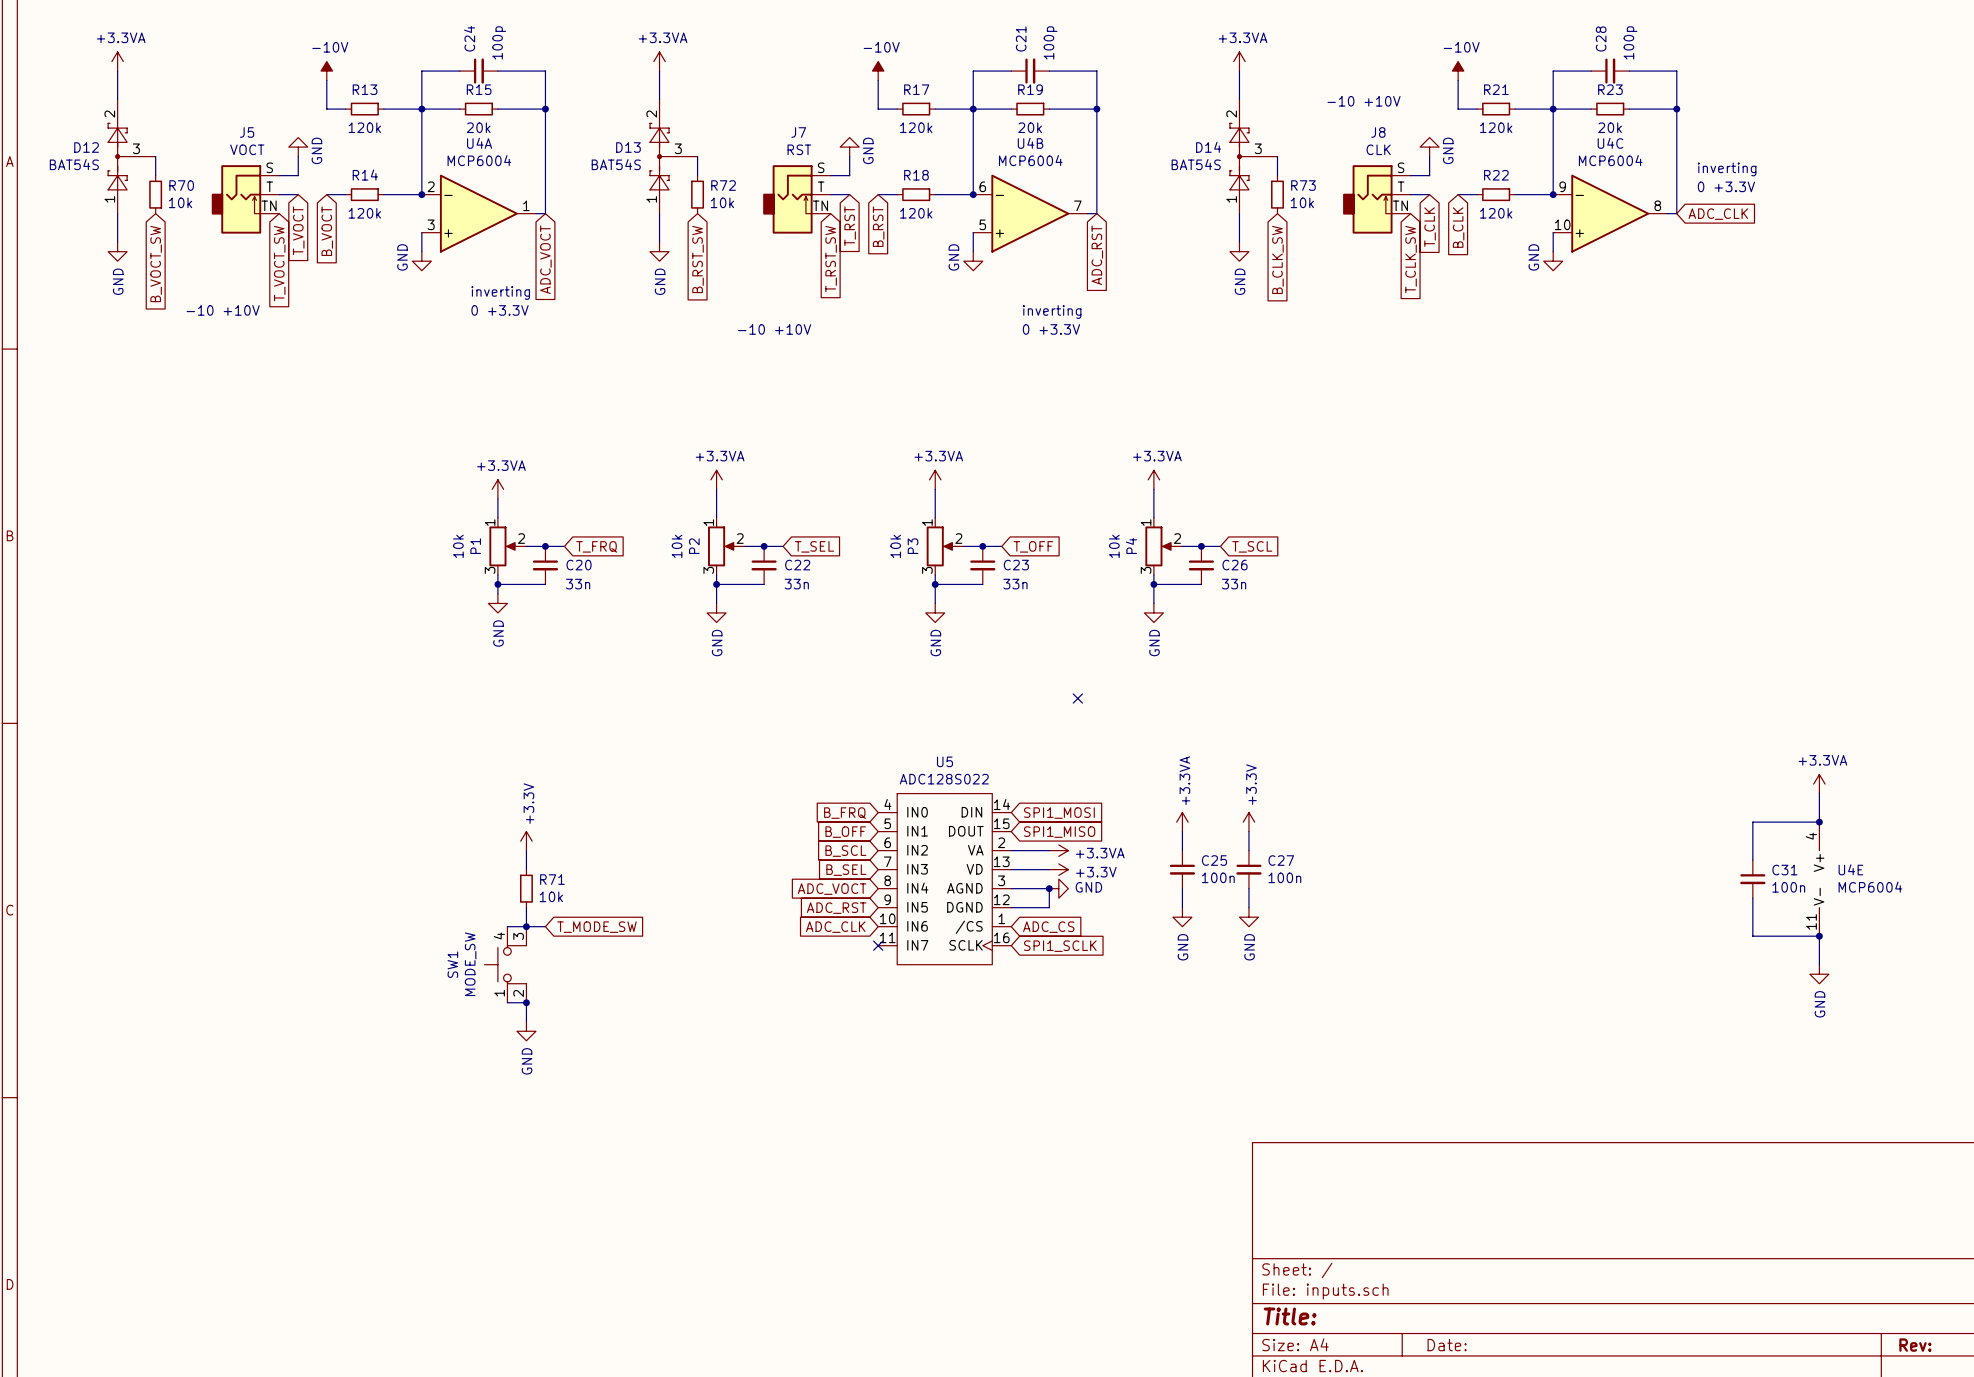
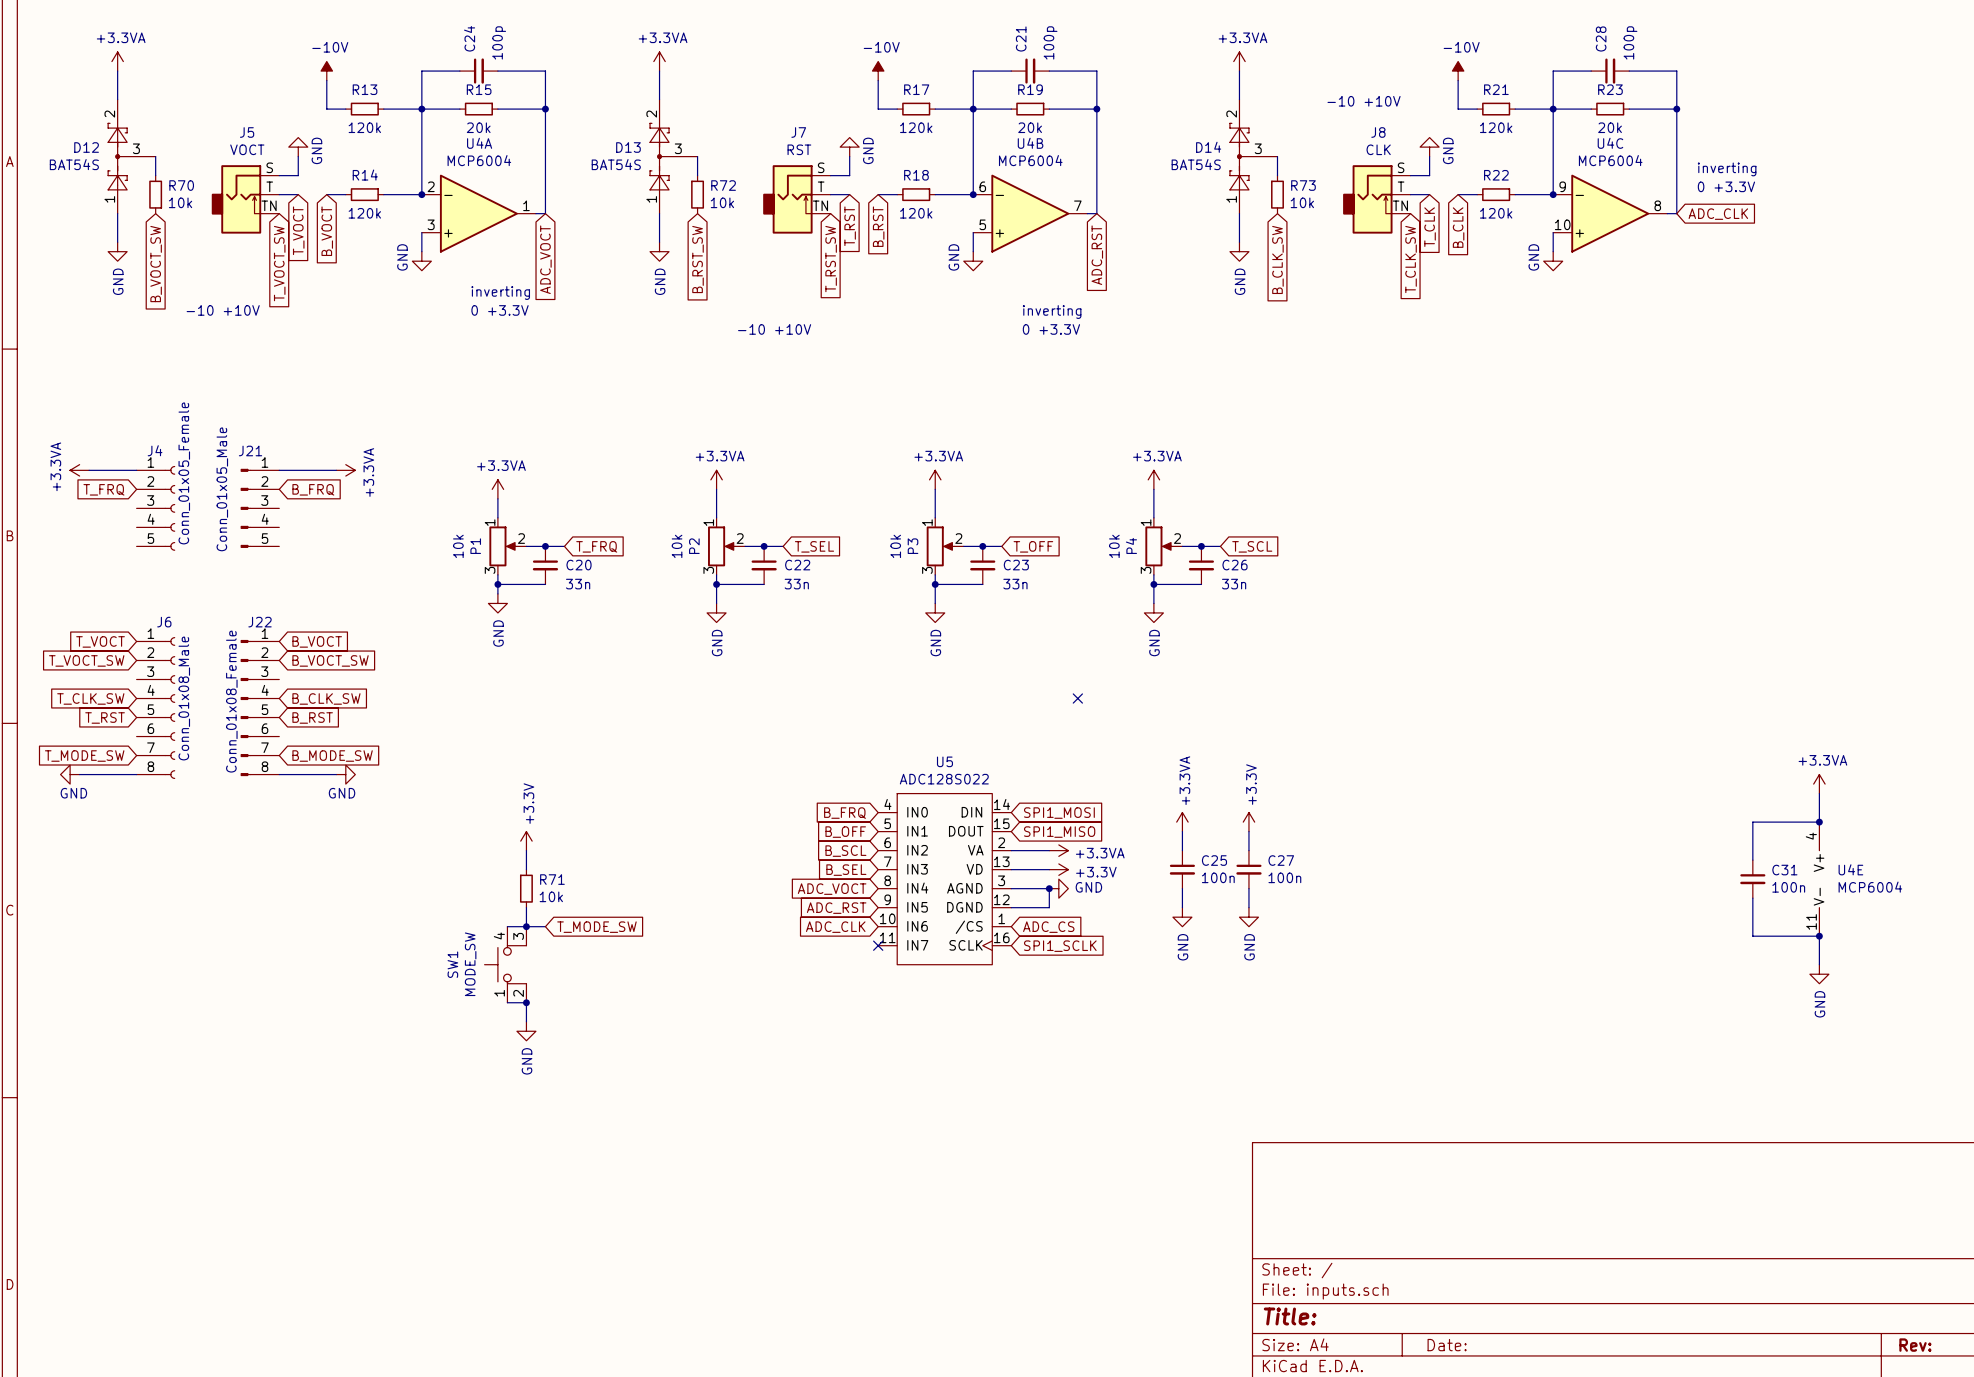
power symbol: none -> +3.3VA (79, 470)
wire: none -> (89, 470) (136, 470)
wire: none -> (279, 470) (336, 470)
power symbol: none -> +3.3VA (345, 470)
global label: none -> T_FRQ (103, 489)
global label: none -> B_FRQ (313, 489)
J4: none -> Conn_01x05_Female (155, 508)
J21: none -> Conn_01x05_Male (259, 508)
global label: none -> T_VOCT (100, 641)
global label: none -> B_VOCT (317, 641)
global label: none -> T_VOCT_SW (86, 660)
global label: none -> B_VOCT_SW (330, 660)
global label: none -> T_CLK_SW (90, 698)
global label: none -> B_CLK_SW (326, 698)
J6: none -> Conn_01x08_Female (155, 708)
J22: none -> Conn_01x08_Male (259, 708)
global label: none -> T_RST (105, 717)
global label: none -> B_RST (312, 717)
global label: none -> T_MODE_SW (84, 756)
global label: none -> B_MODE_SW (332, 756)
power symbol: none -> GND (70, 774)
wire: none -> (79, 774) (136, 774)
wire: none -> (279, 774) (336, 774)
power symbol: none -> GND (345, 774)

